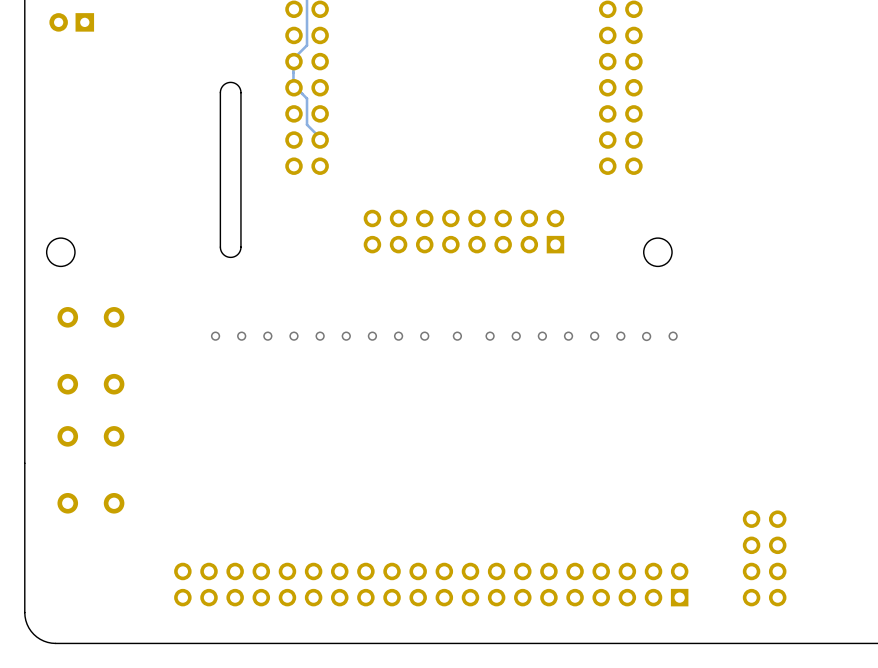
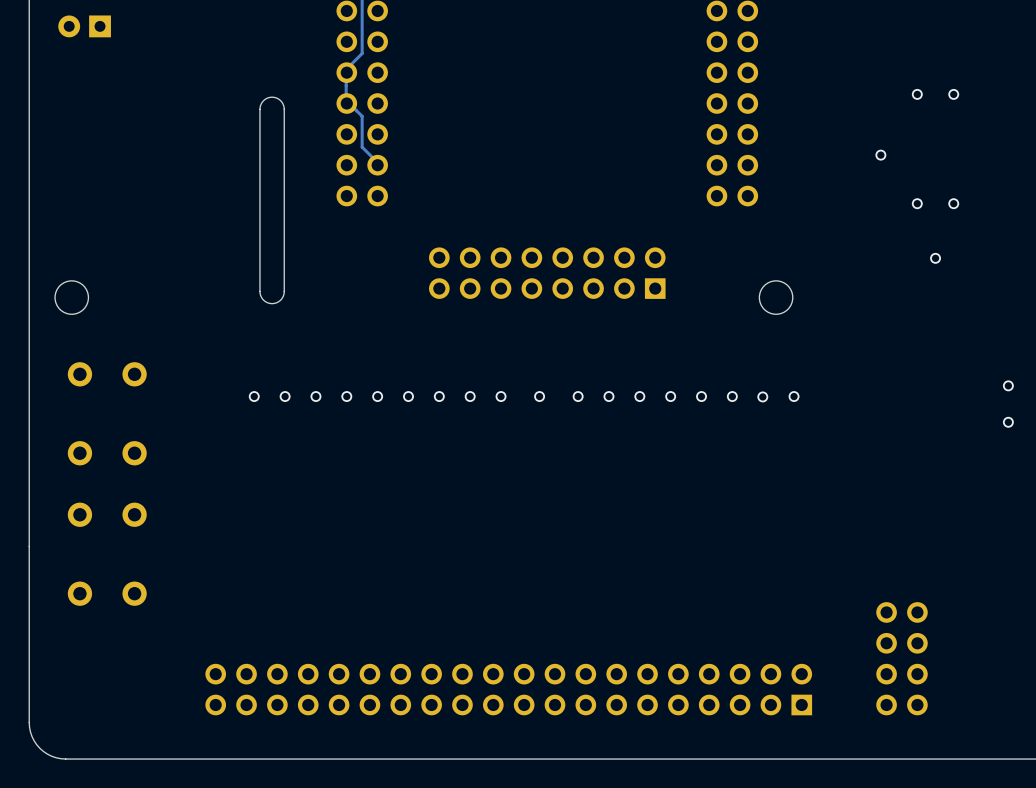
via: none -> (917, 94)
via: none -> (953, 94)
via: none -> (880, 155)
via: none -> (917, 203)
via: none -> (953, 203)
via: none -> (935, 258)
via: none -> (1008, 385)
via: none -> (1008, 422)

